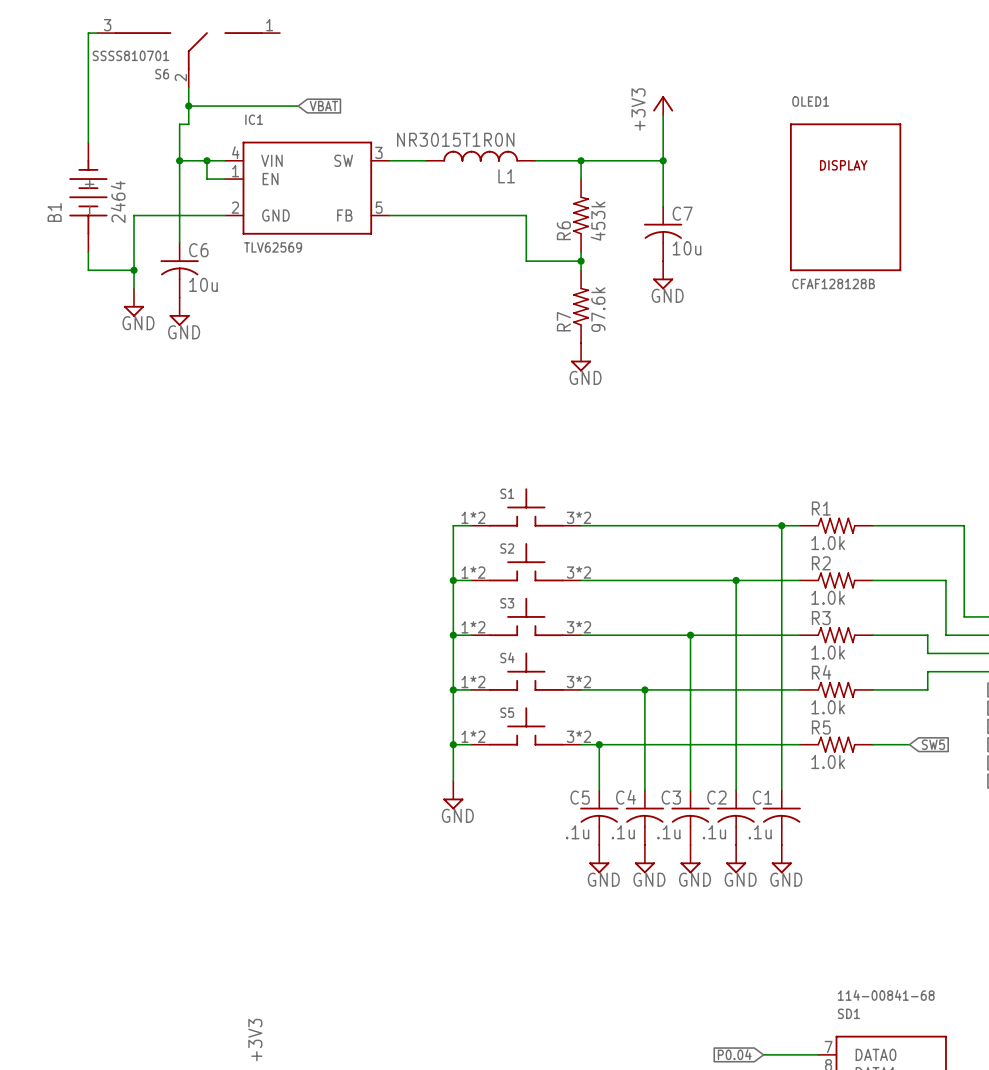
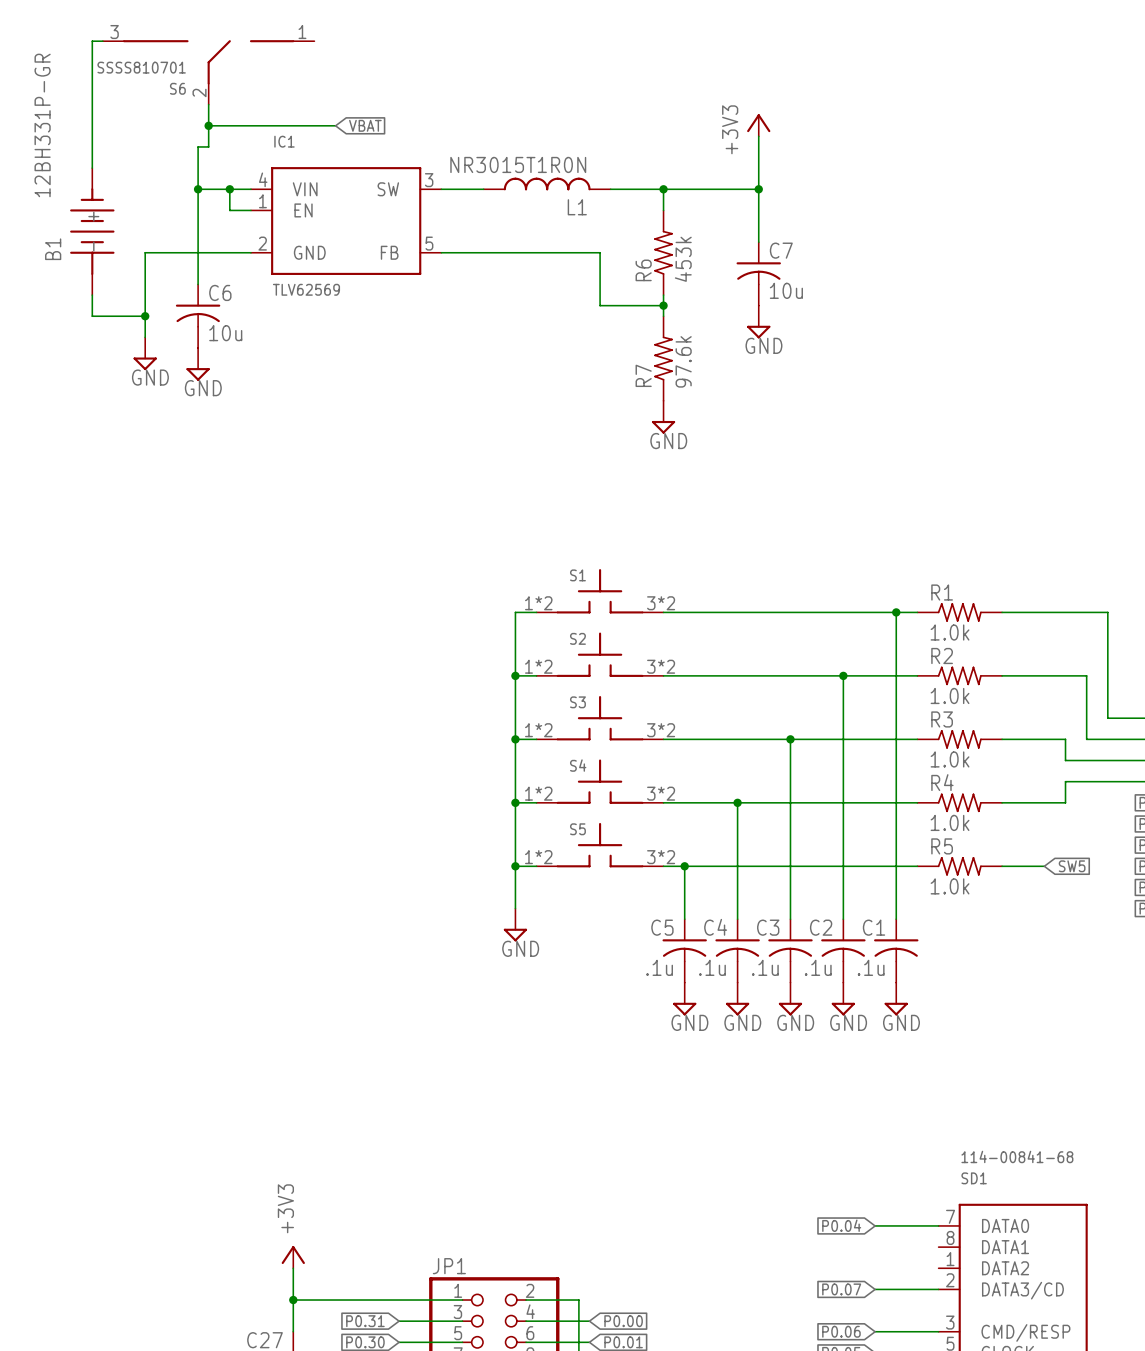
OLED1: CFAF128128B (845, 197) -> none
B1 value: 2464 (118, 202) -> 12BH331P-GR (42, 125)

